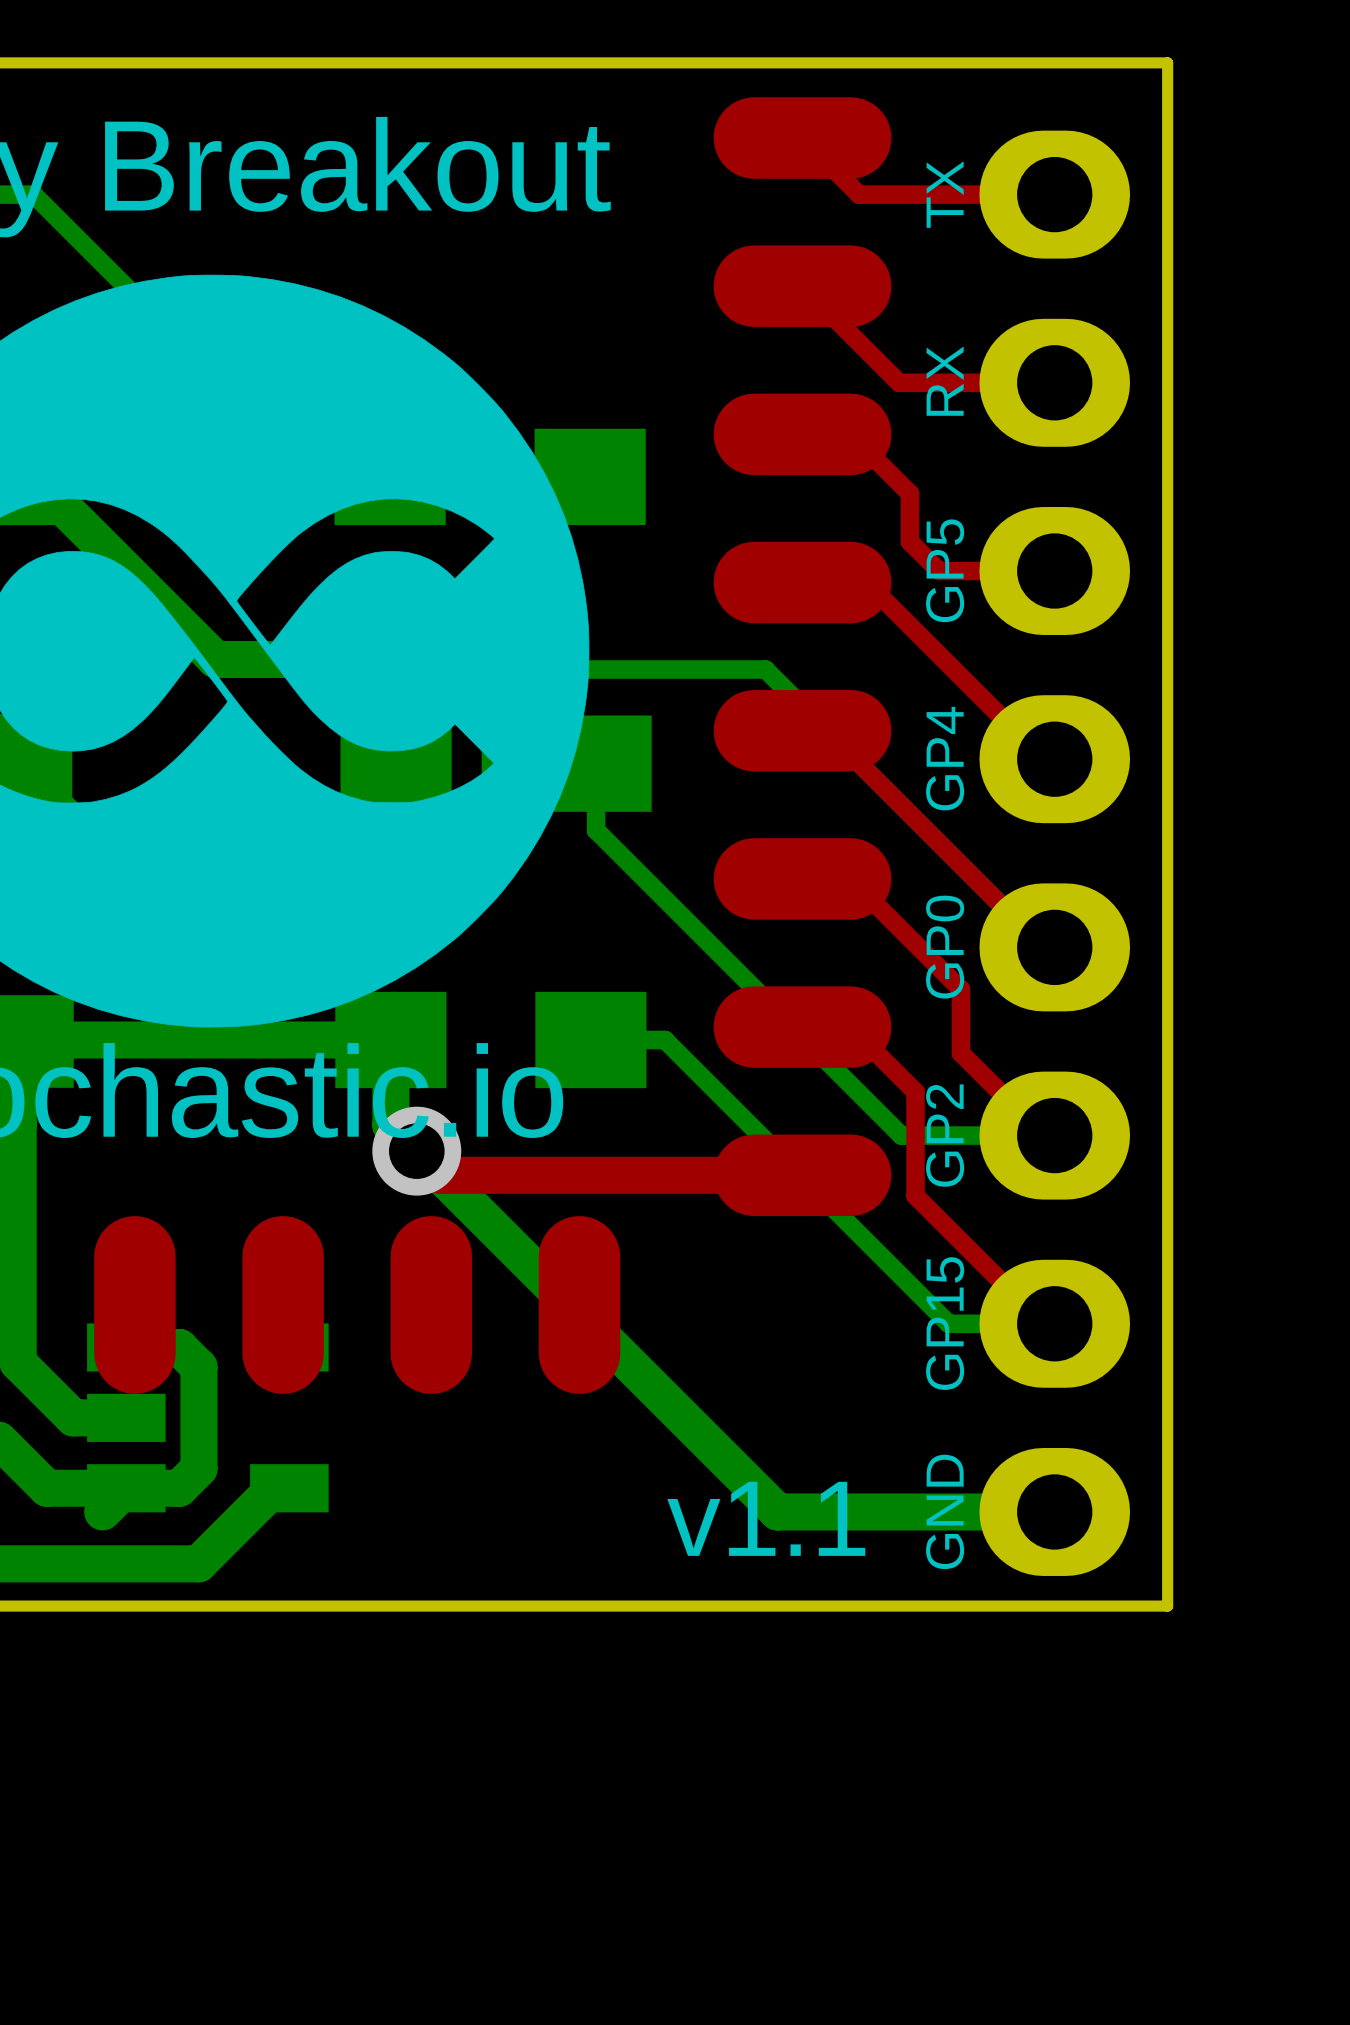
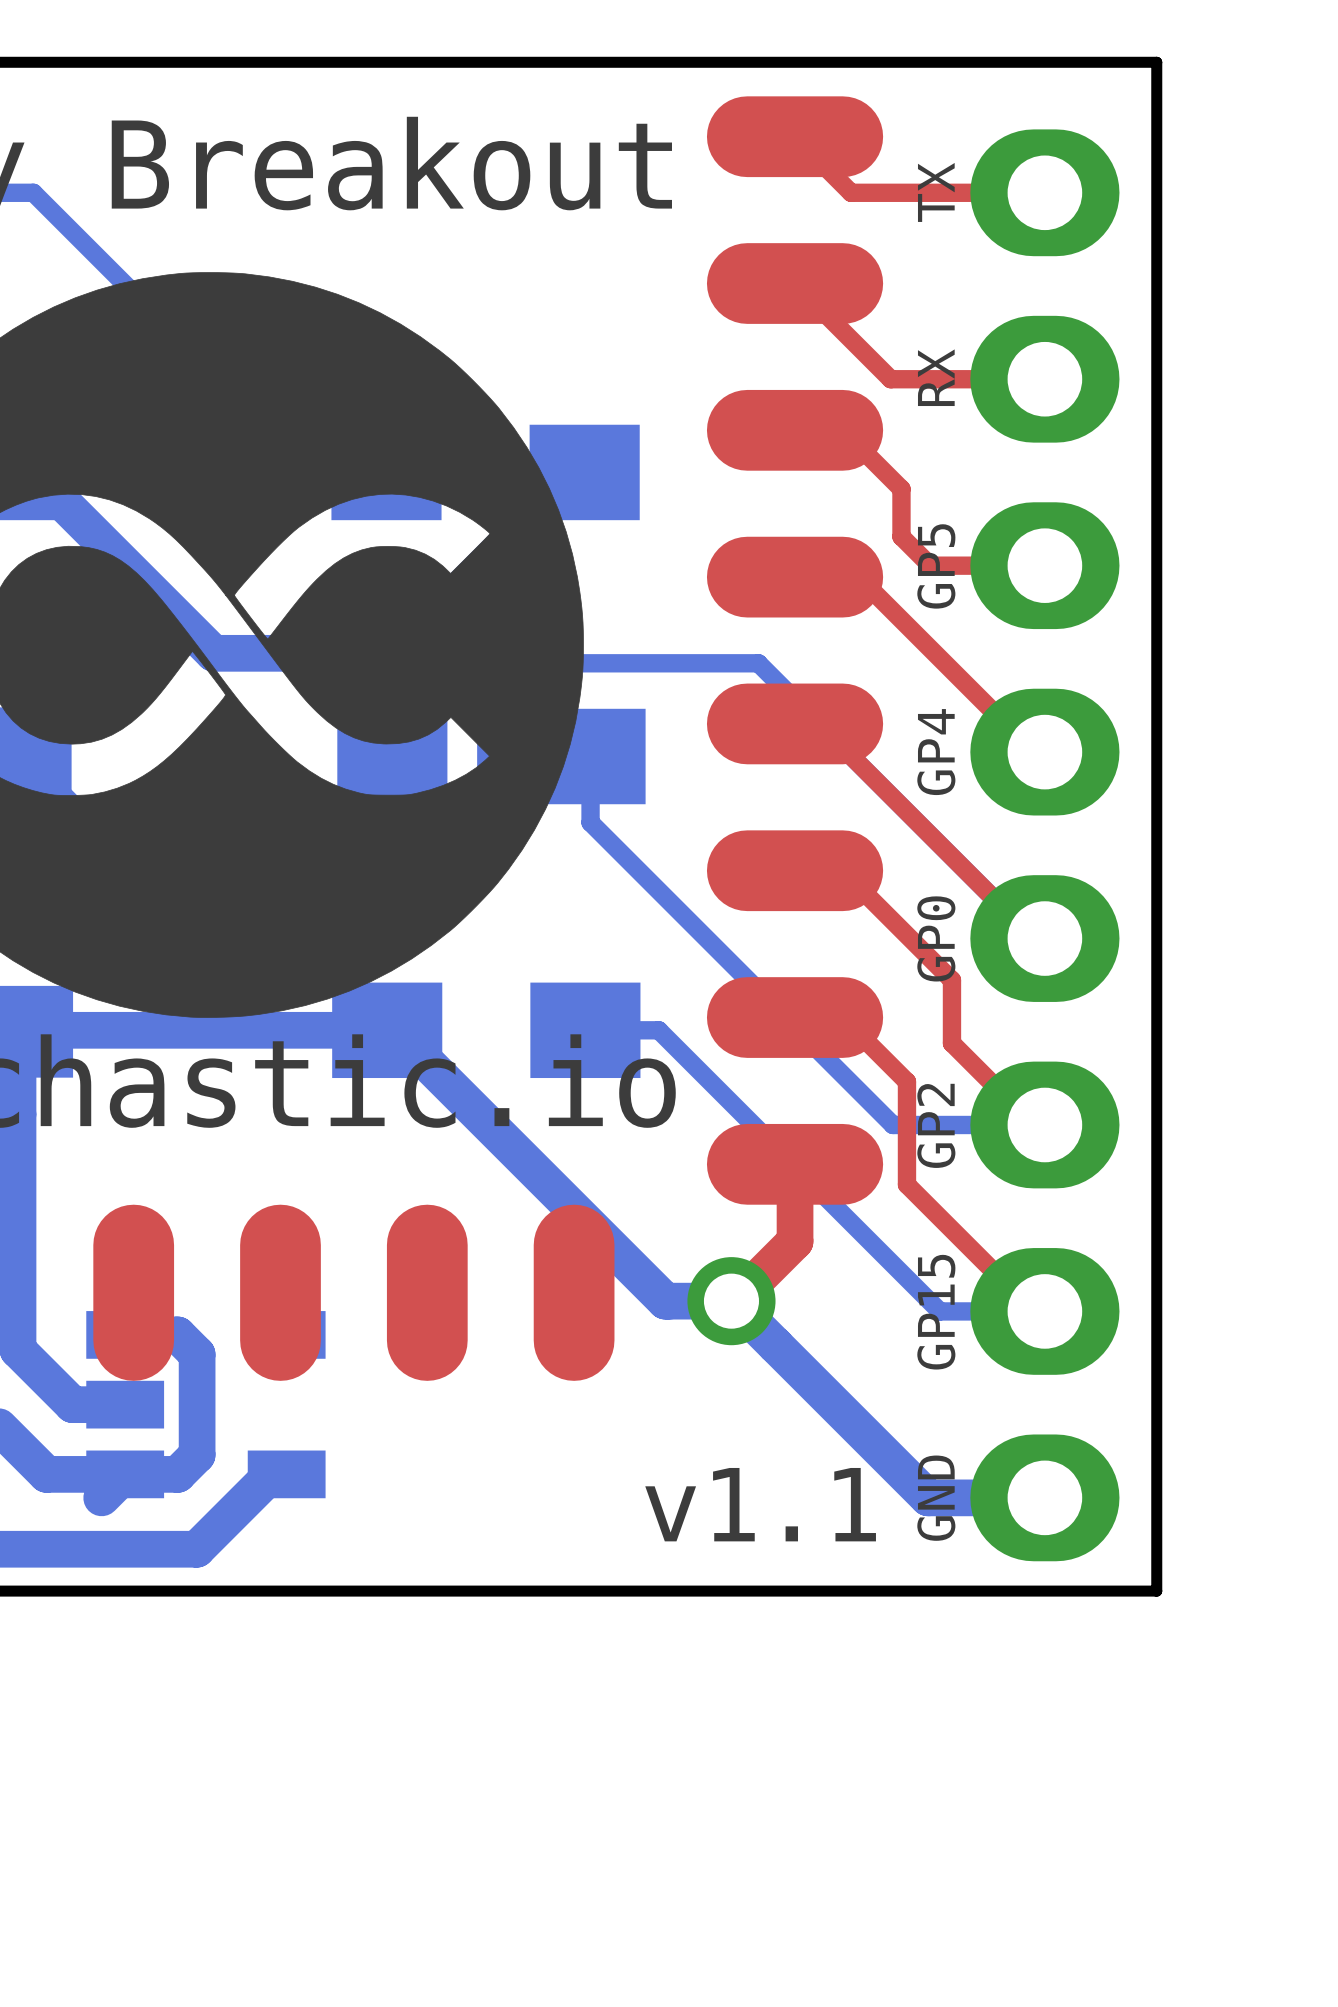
bottom track: (390, 1040) (390, 1125) (777, 1511) (936, 1511) -> (387, 1030) (394, 1030) (665, 1301) (731, 1301) (928, 1497)
top track: (416, 1151) (440, 1175) (802, 1175) -> (731, 1301) (735, 1301) (795, 1241) (795, 1164)
via position: (416, 1151) -> (731, 1301)

